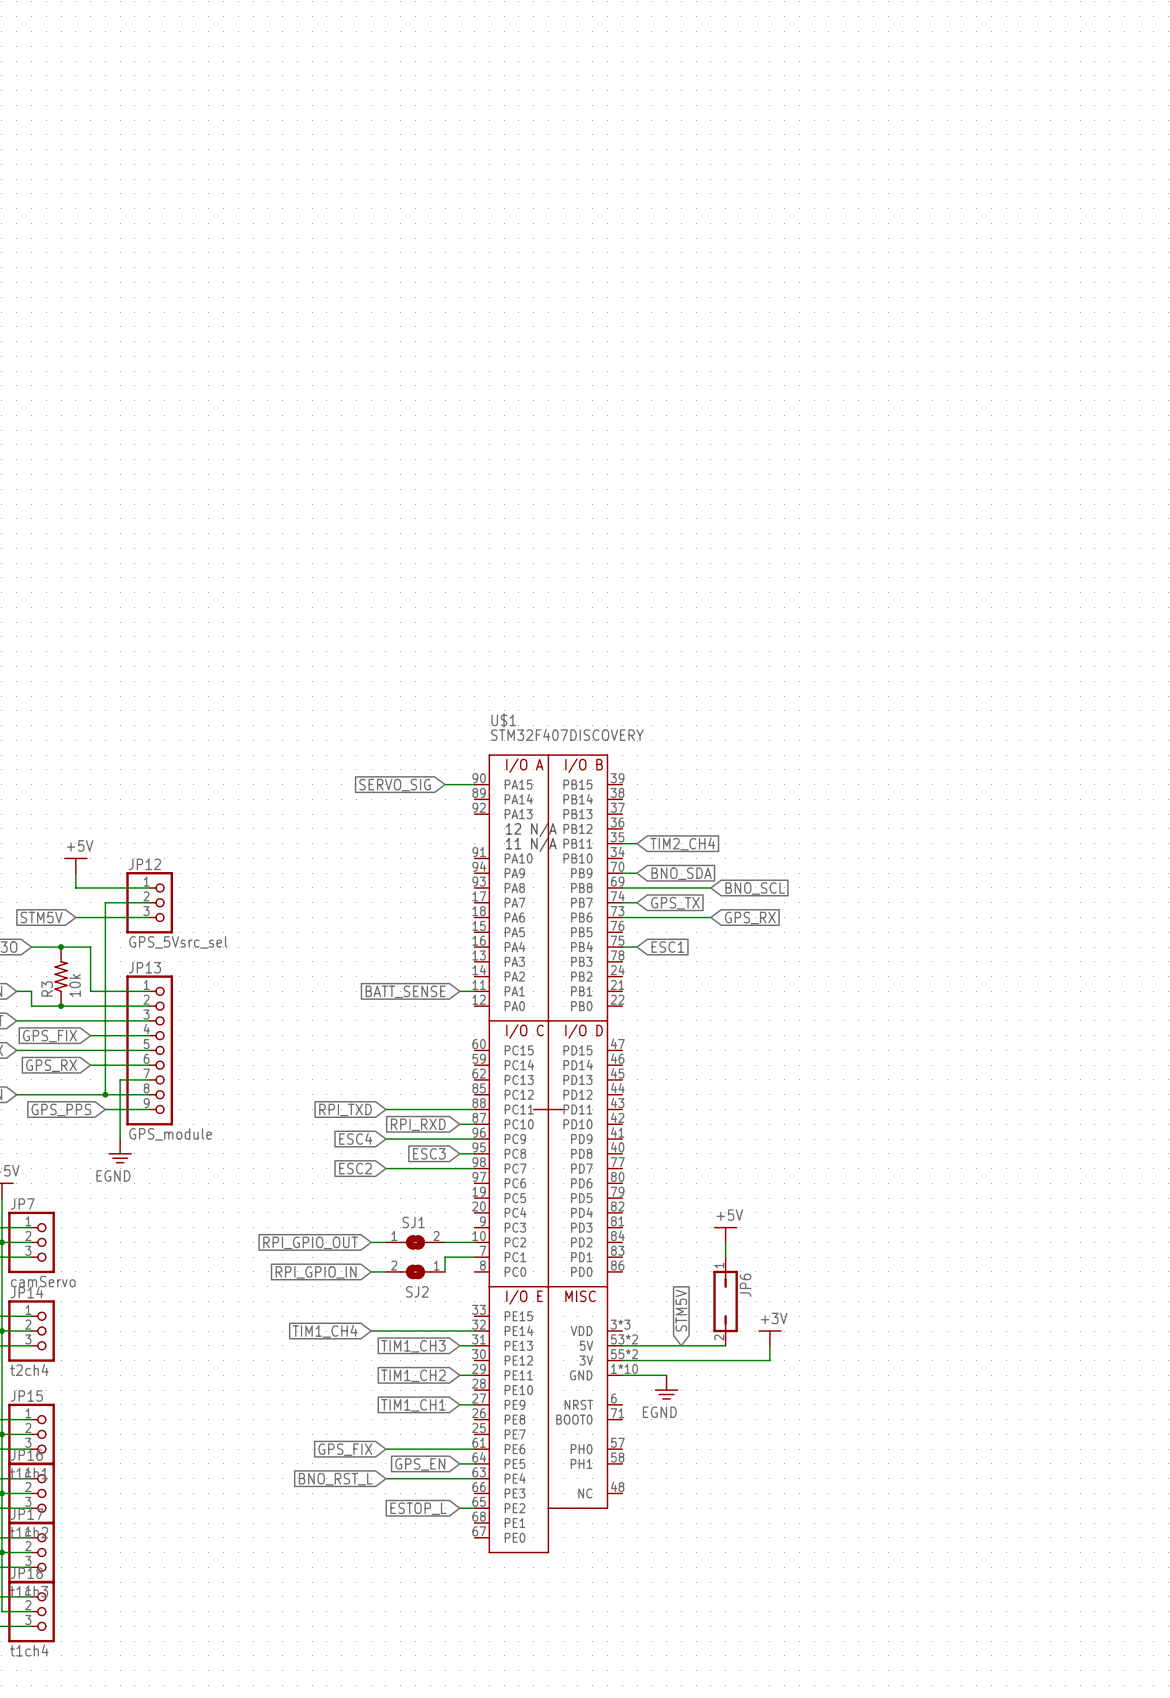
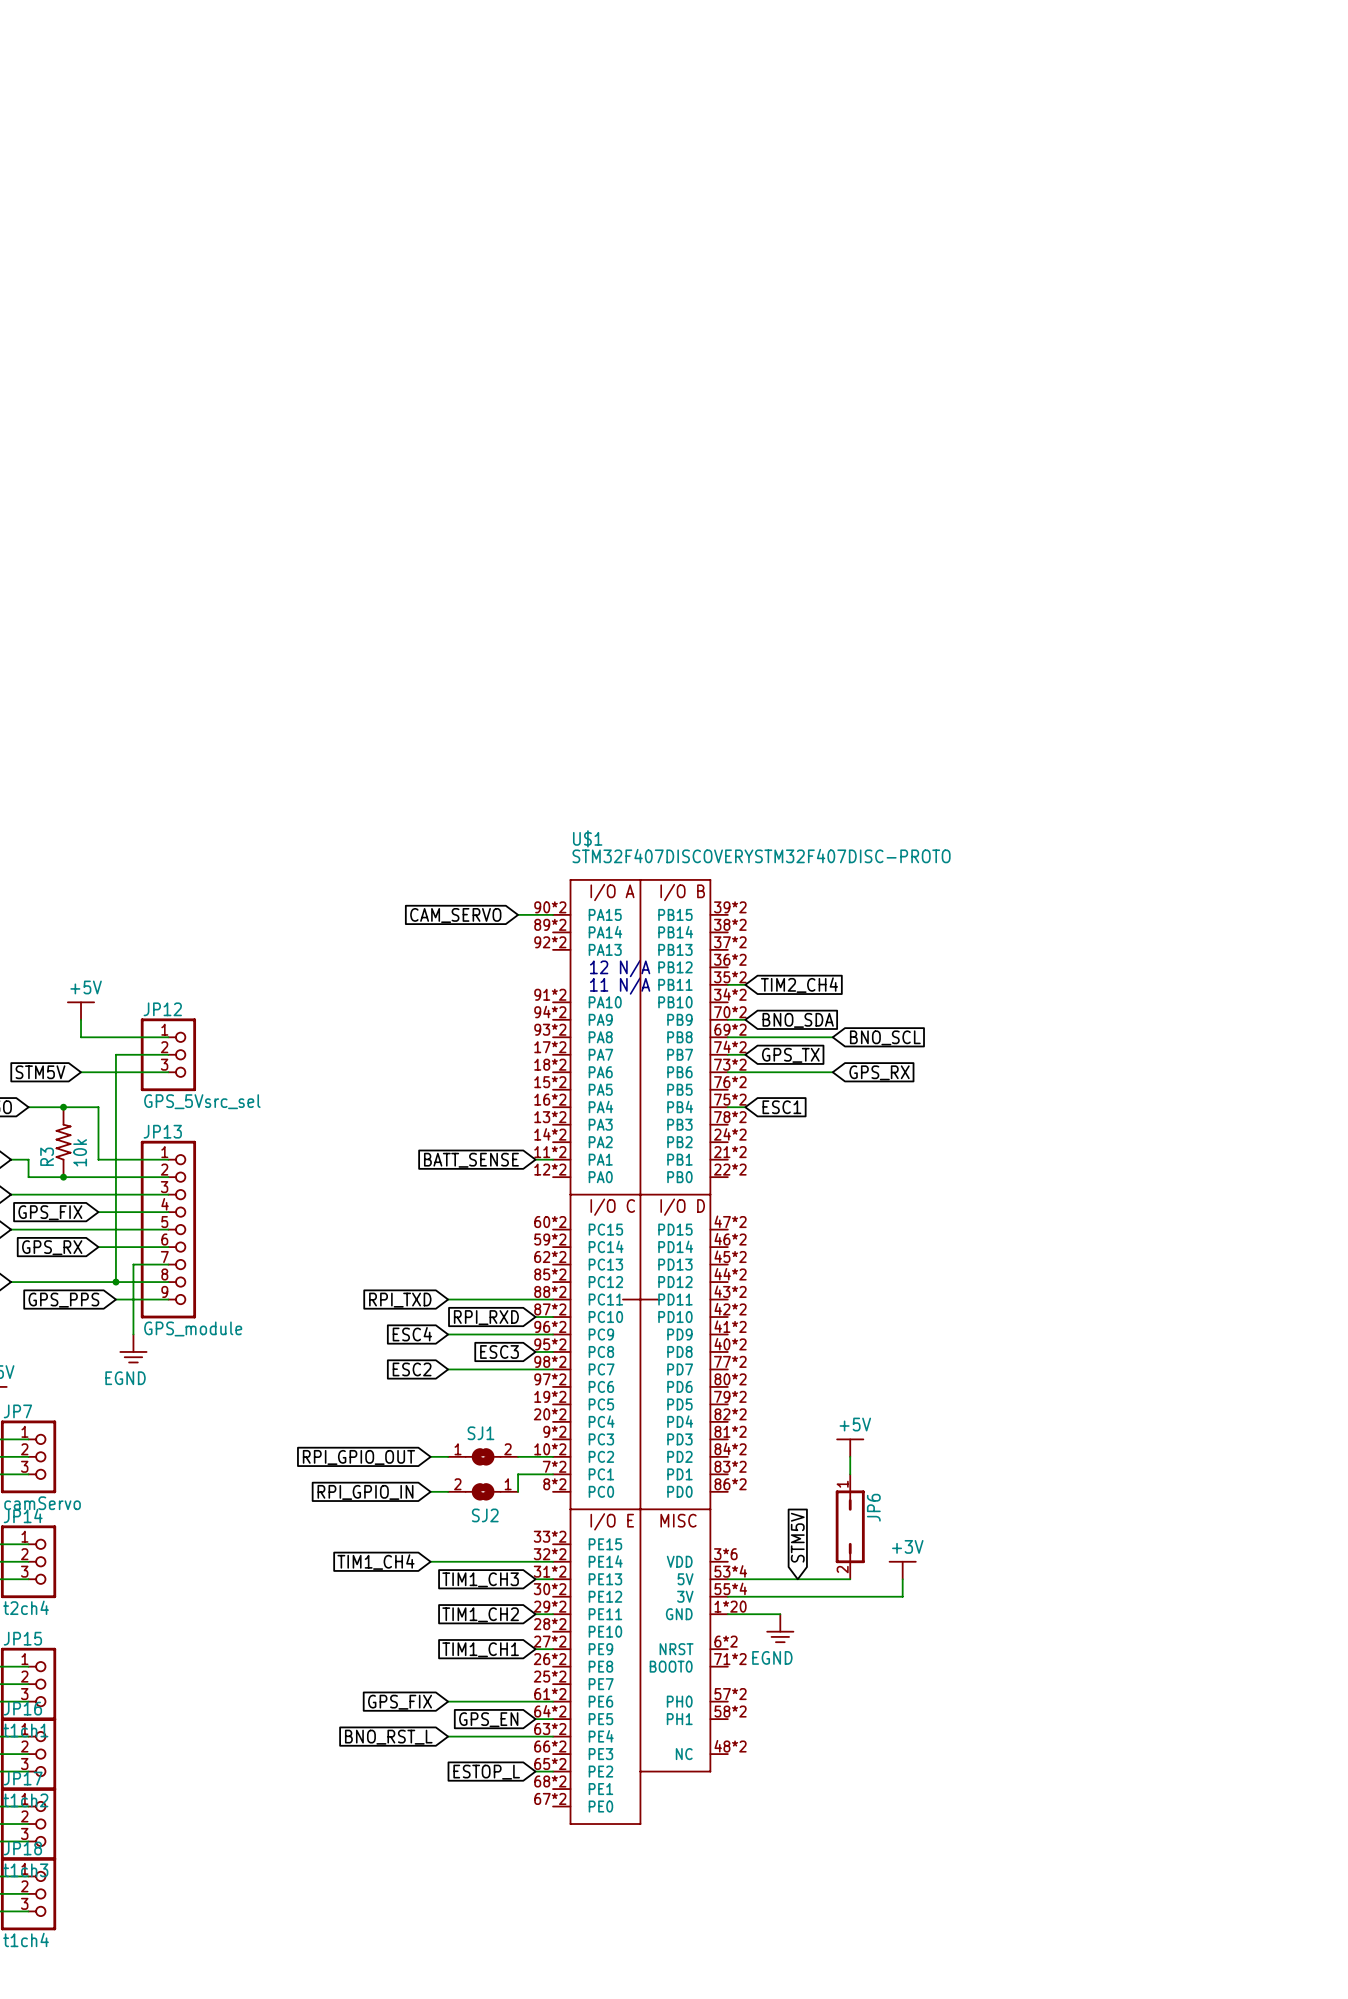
U$1 value: STM32F407DISCOVERY (567, 734) -> STM32F407DISCOVERYSTM32F407DISC-PROTO (761, 856)
U$1 symbol: [474, 754, 623, 1554] -> [553, 879, 728, 1825]
global label: SERVO_SIG (395, 785) -> CAM_SERVO (455, 915)

